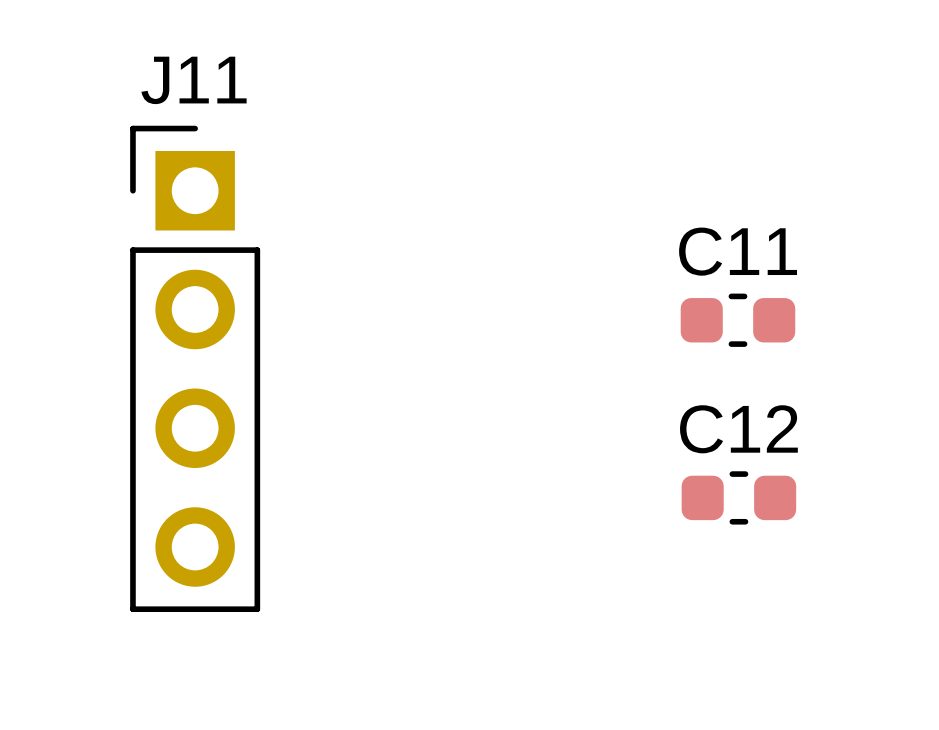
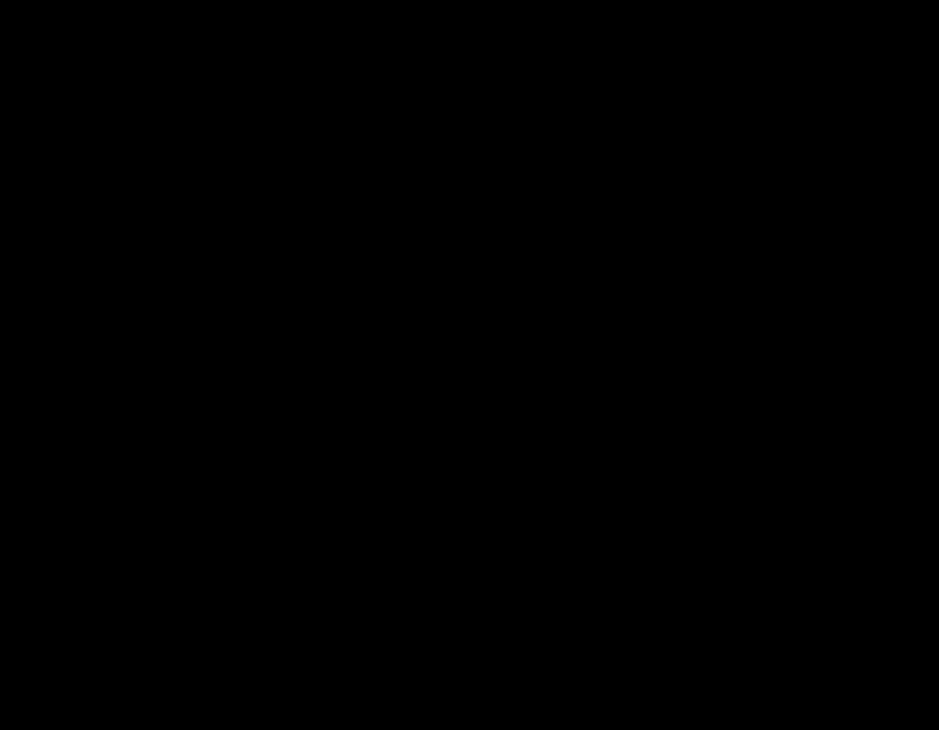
C11: (737, 320) -> none
J11: (195, 368) -> none
C12: (738, 497) -> none

